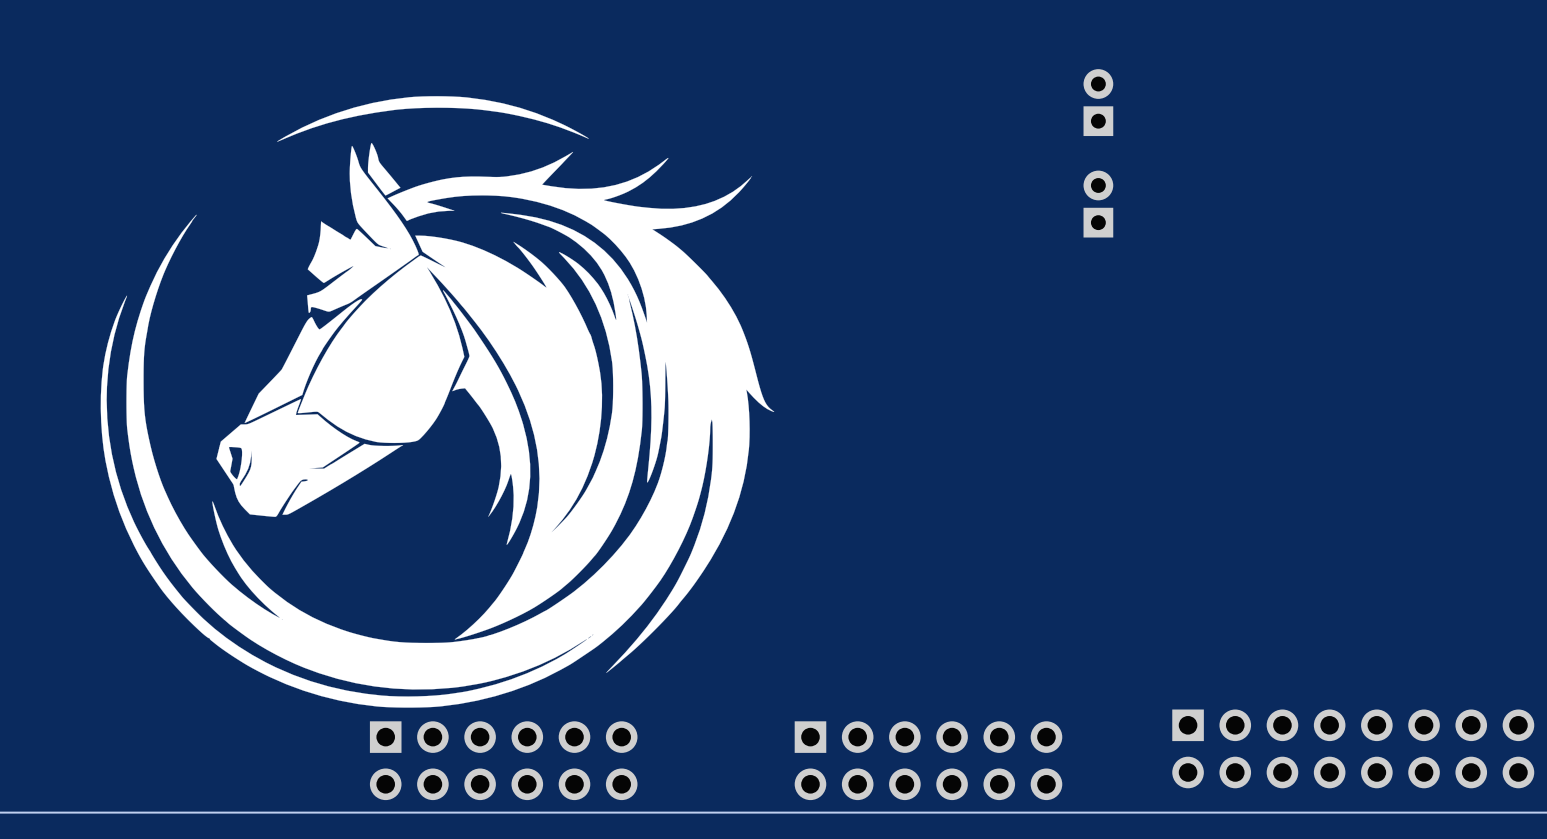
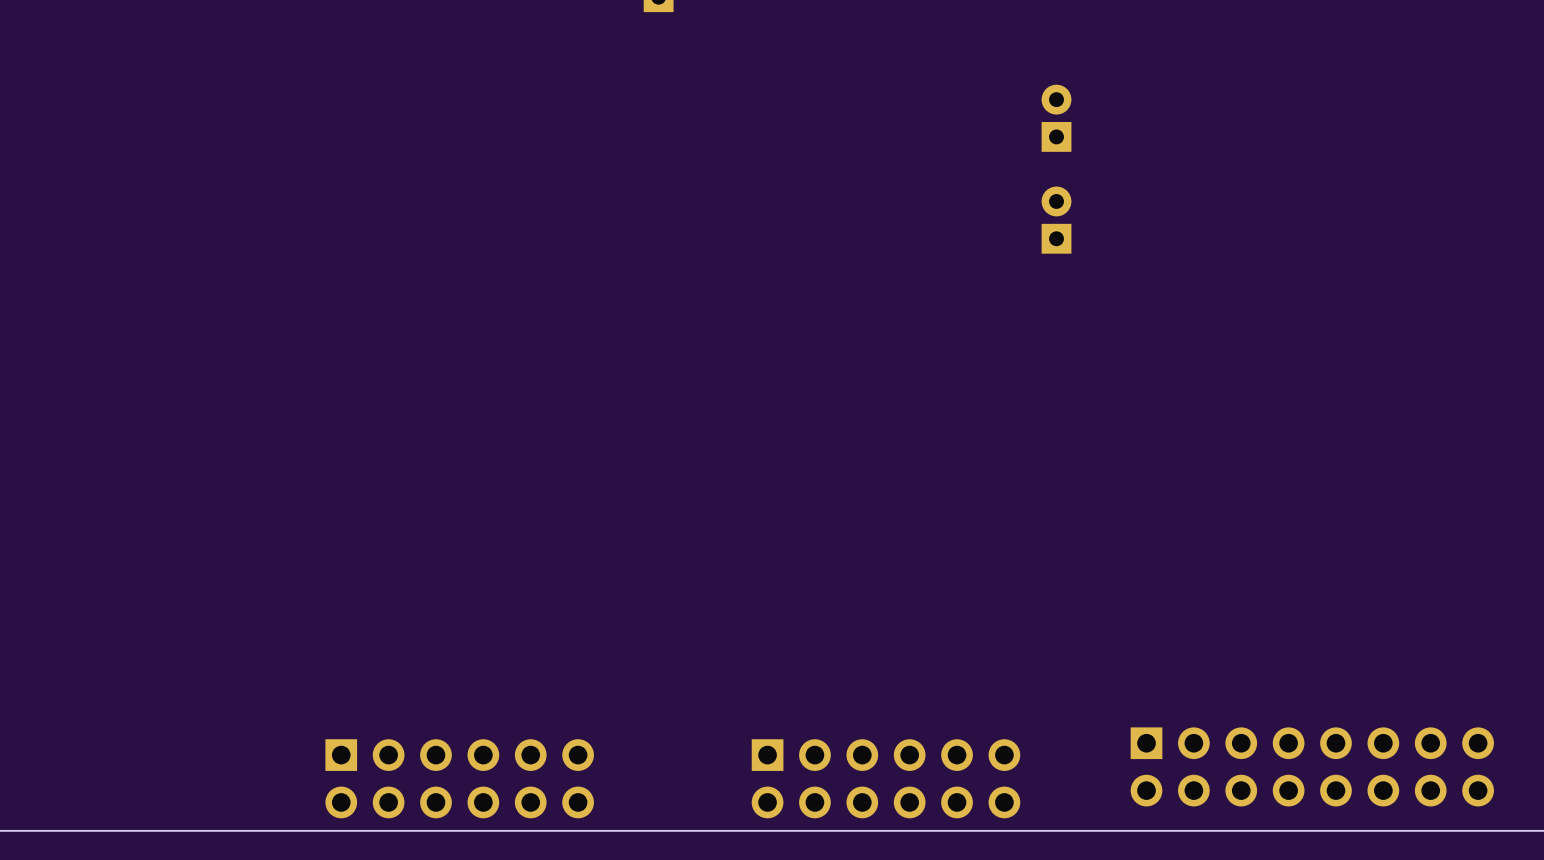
drawing: [100, 96, 775, 708] -> none

